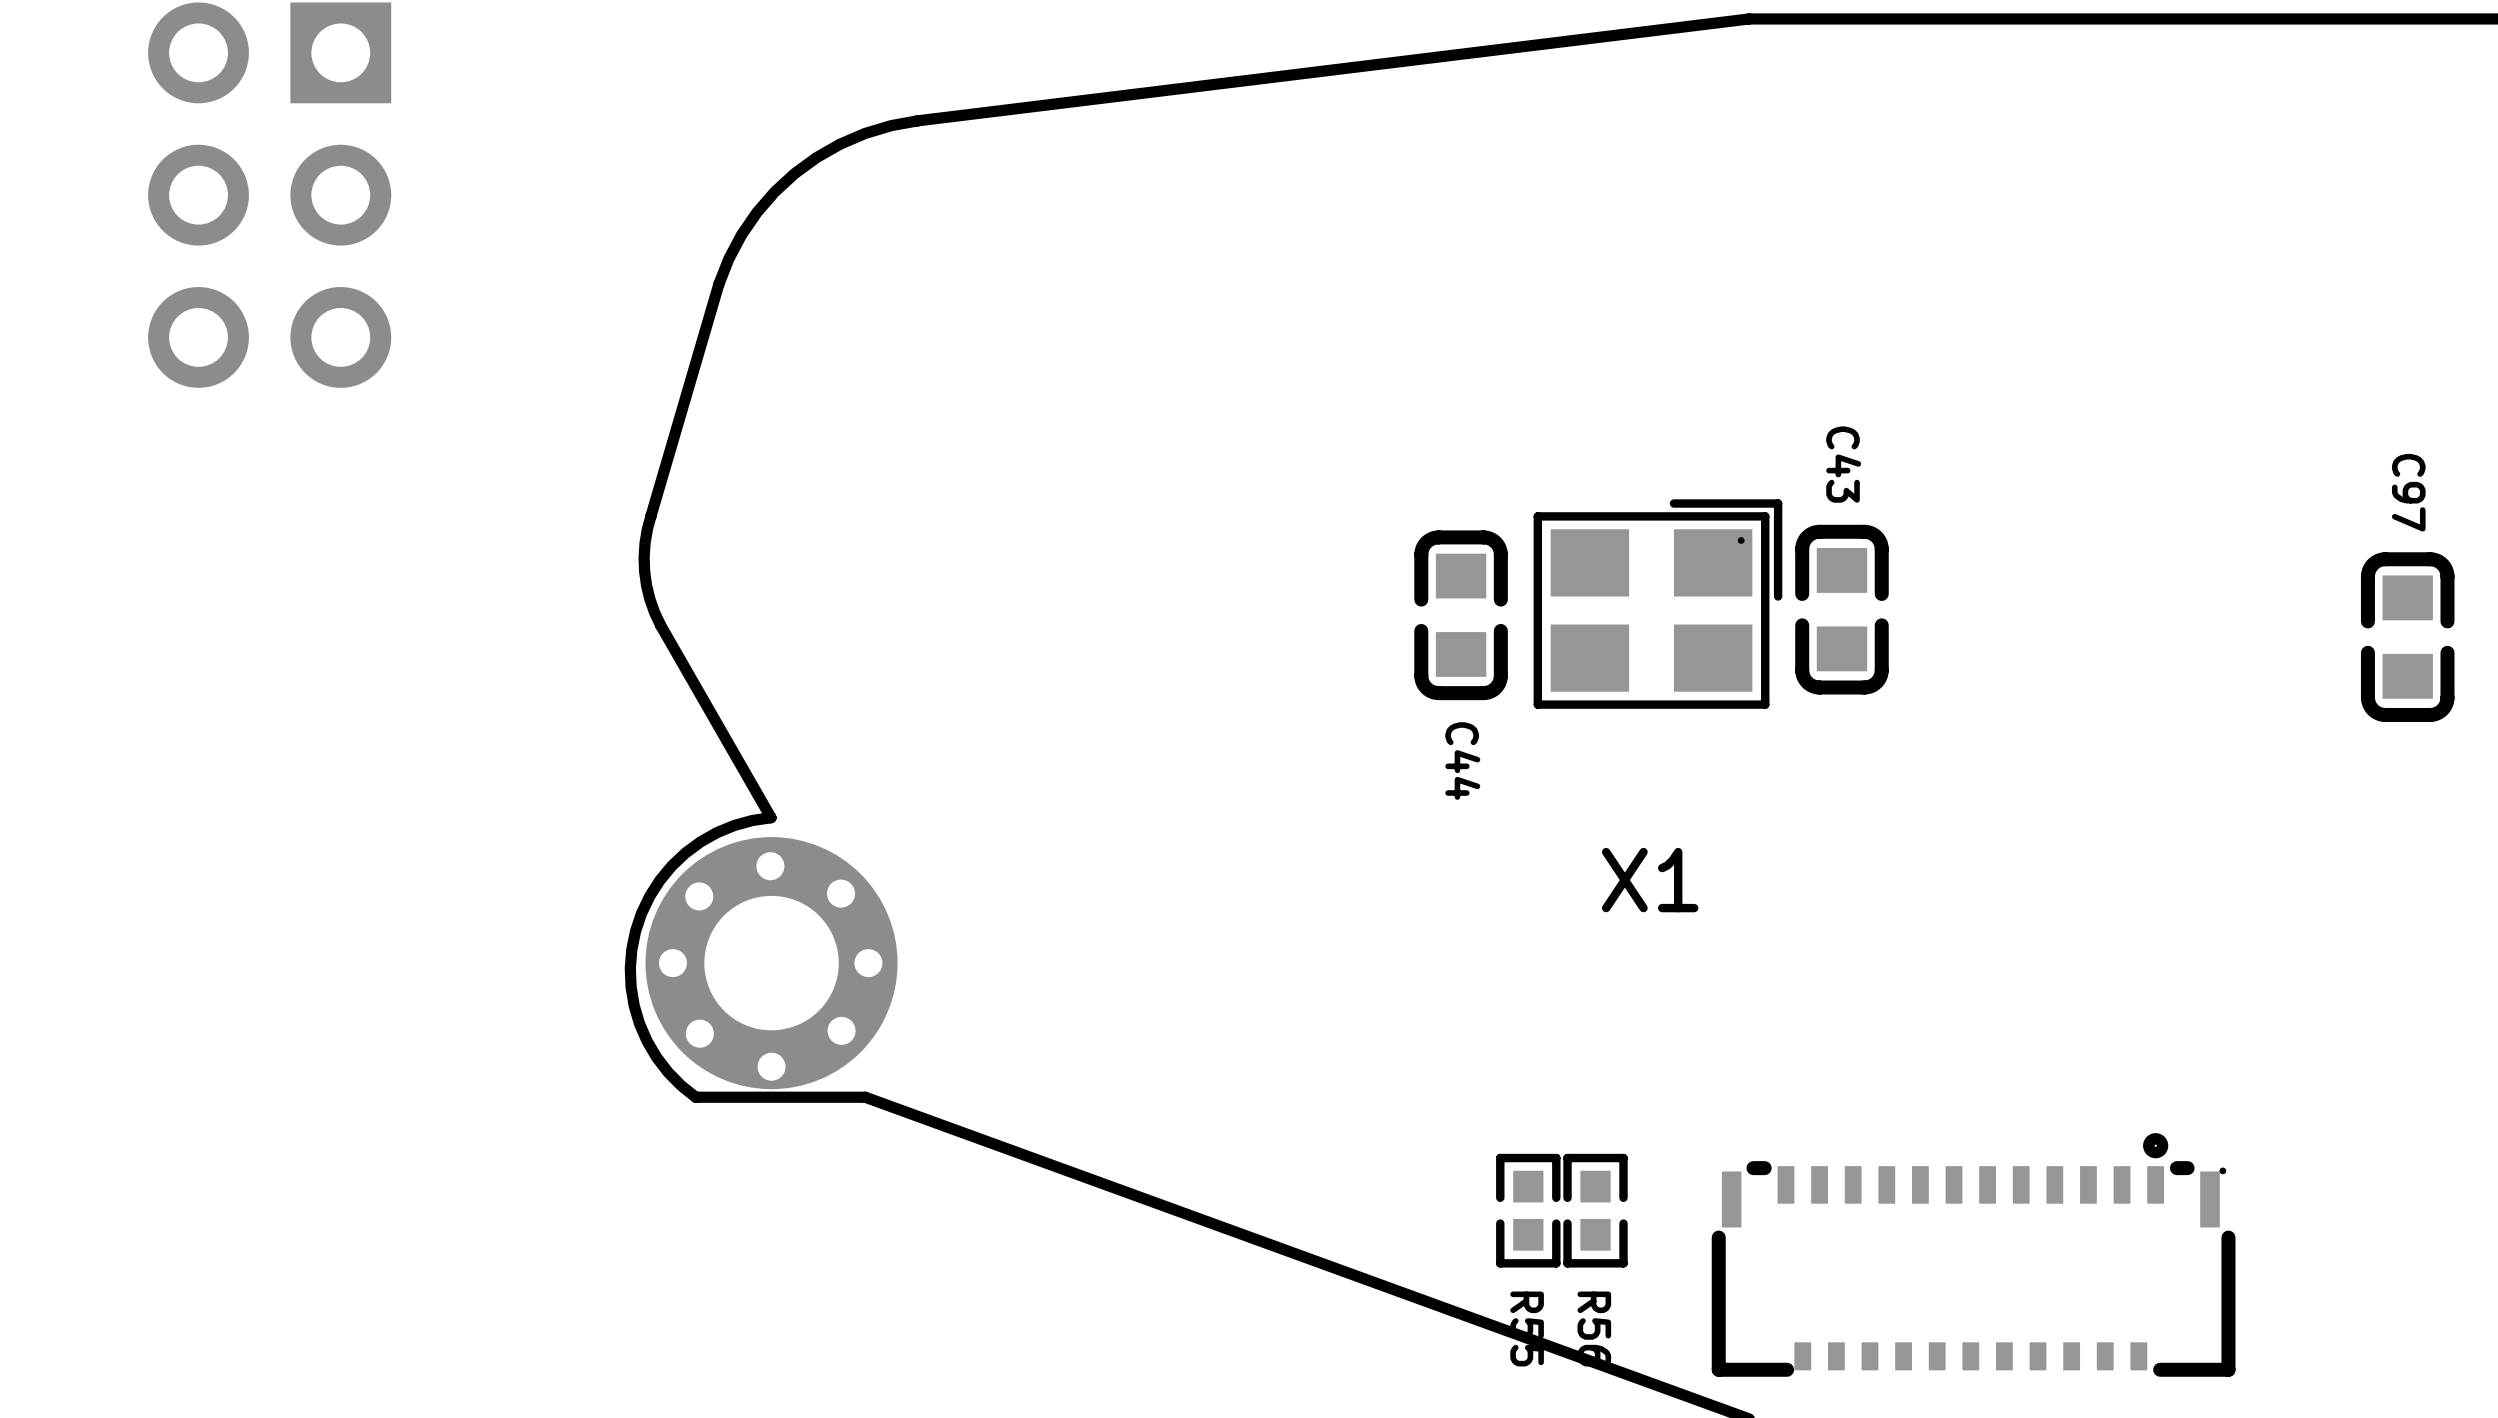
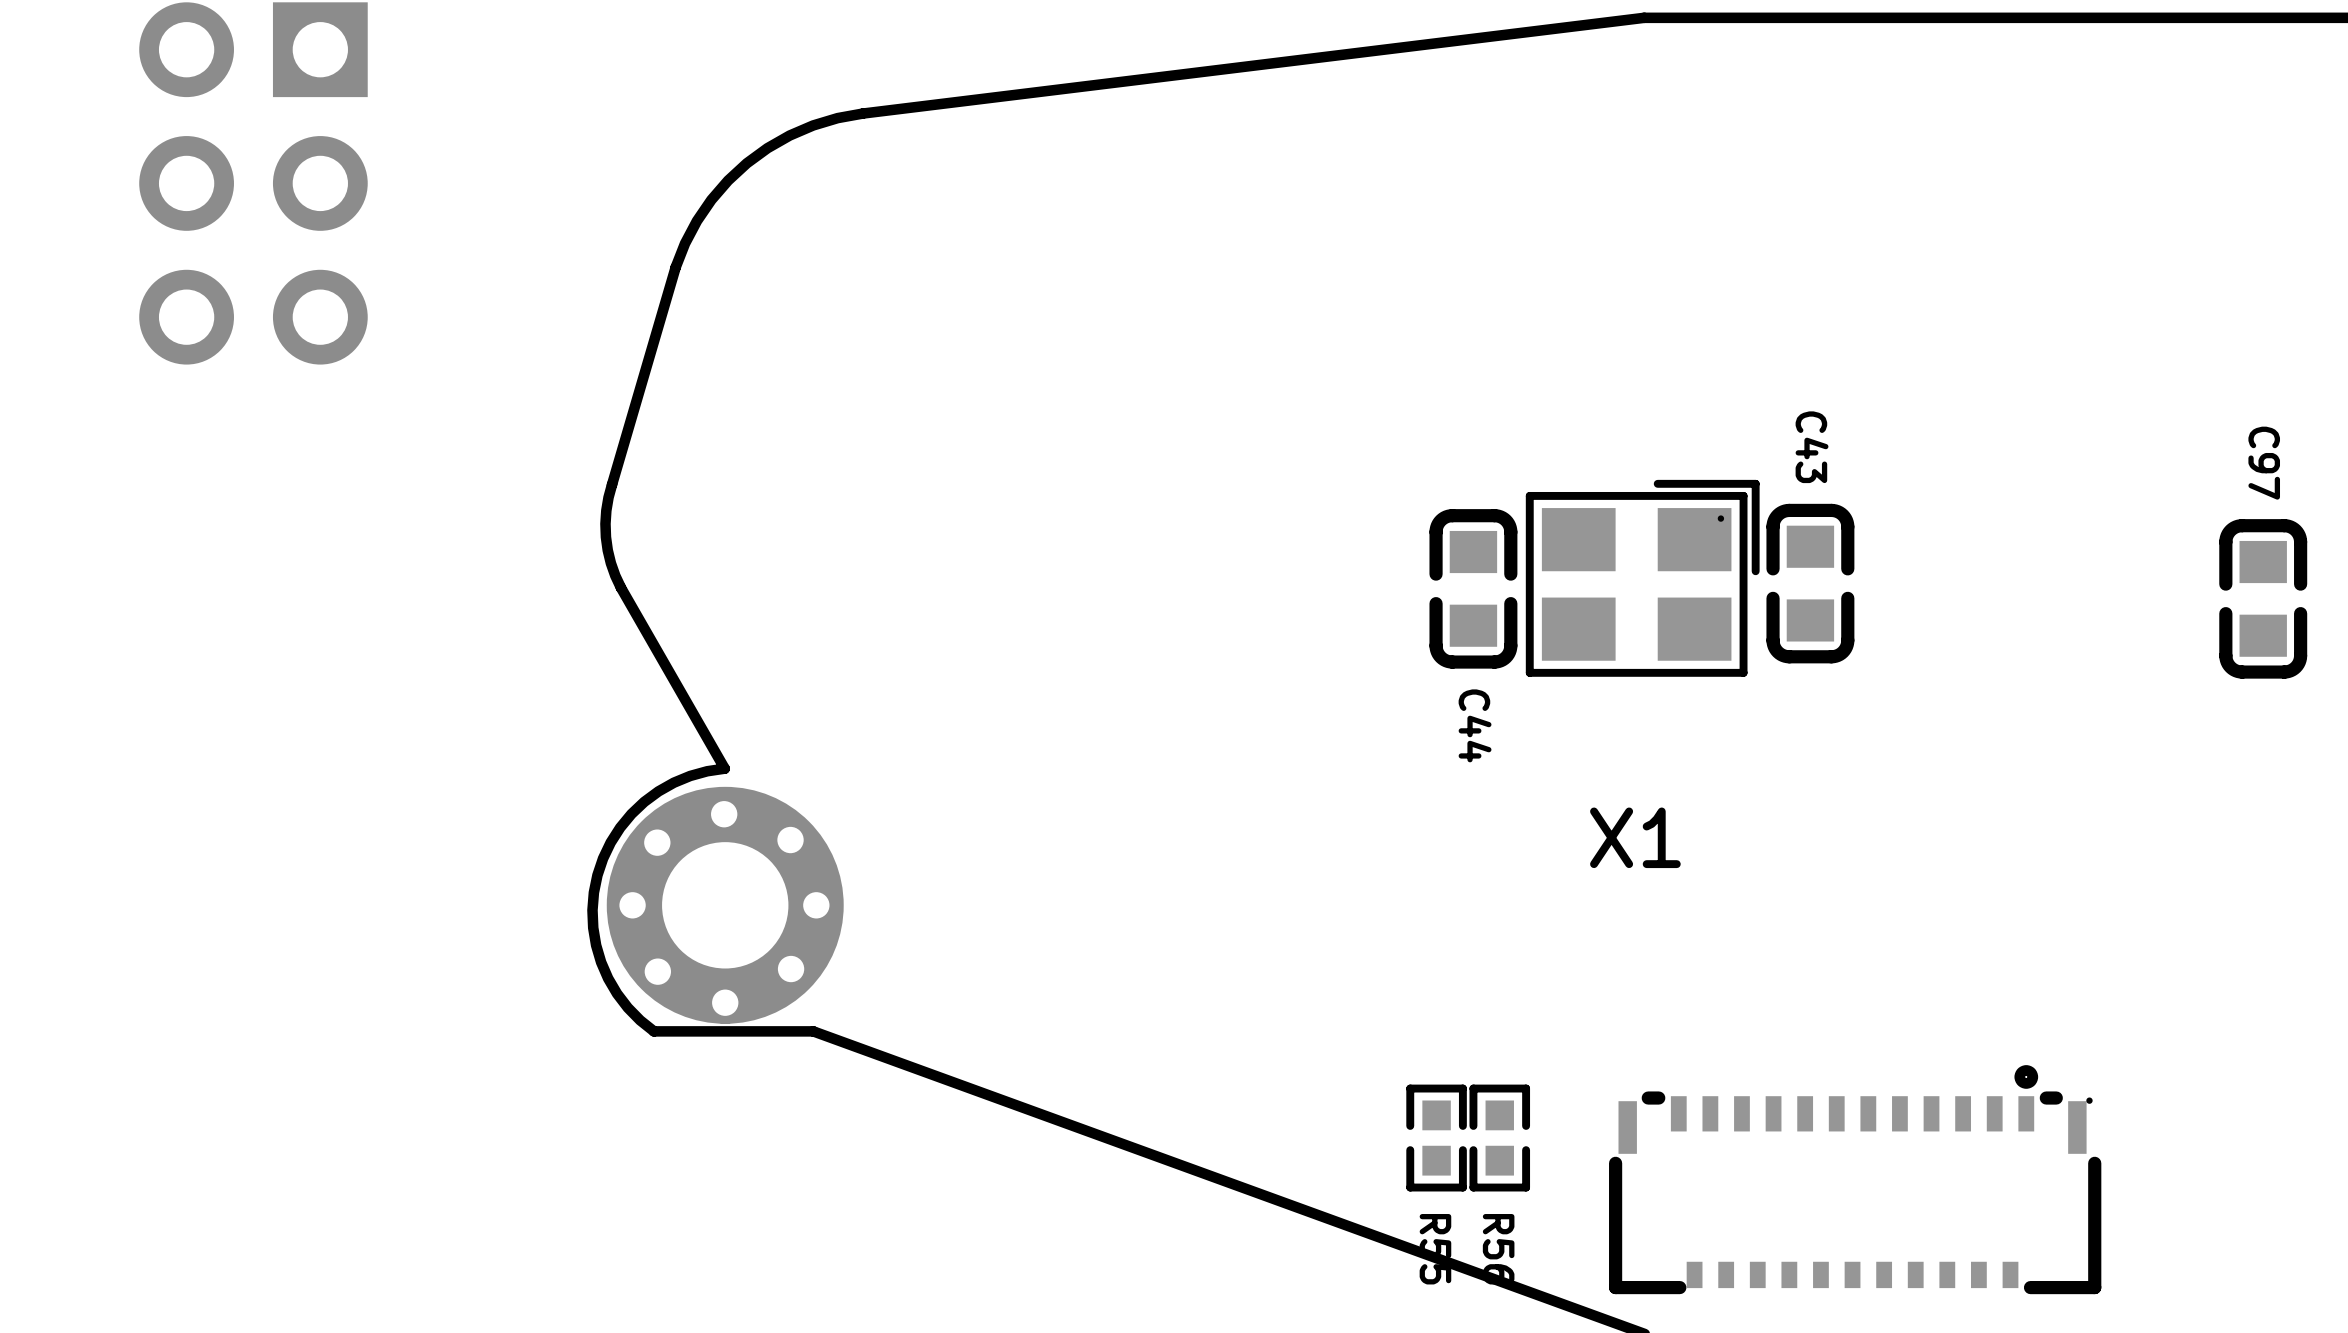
X1 position: (1657, 604) -> (1642, 578)
C43 position: (1841, 609) -> (1810, 583)
C44 position: (1461, 615) -> (1473, 588)

